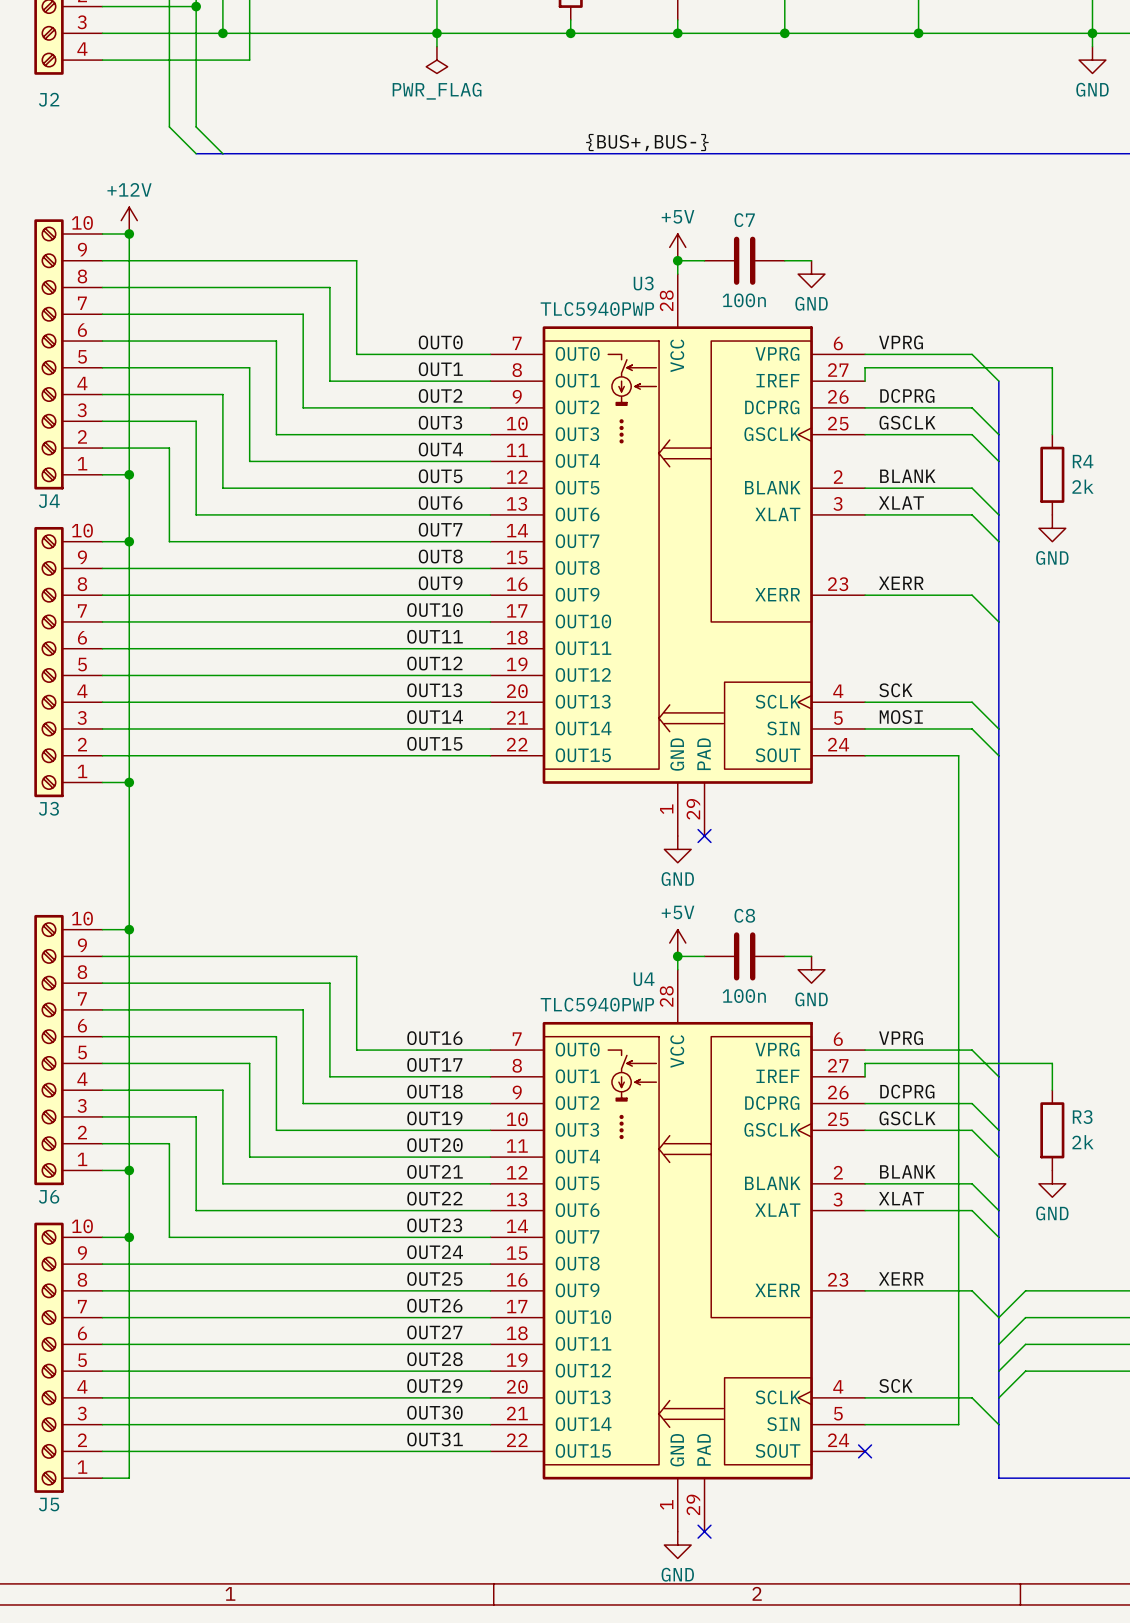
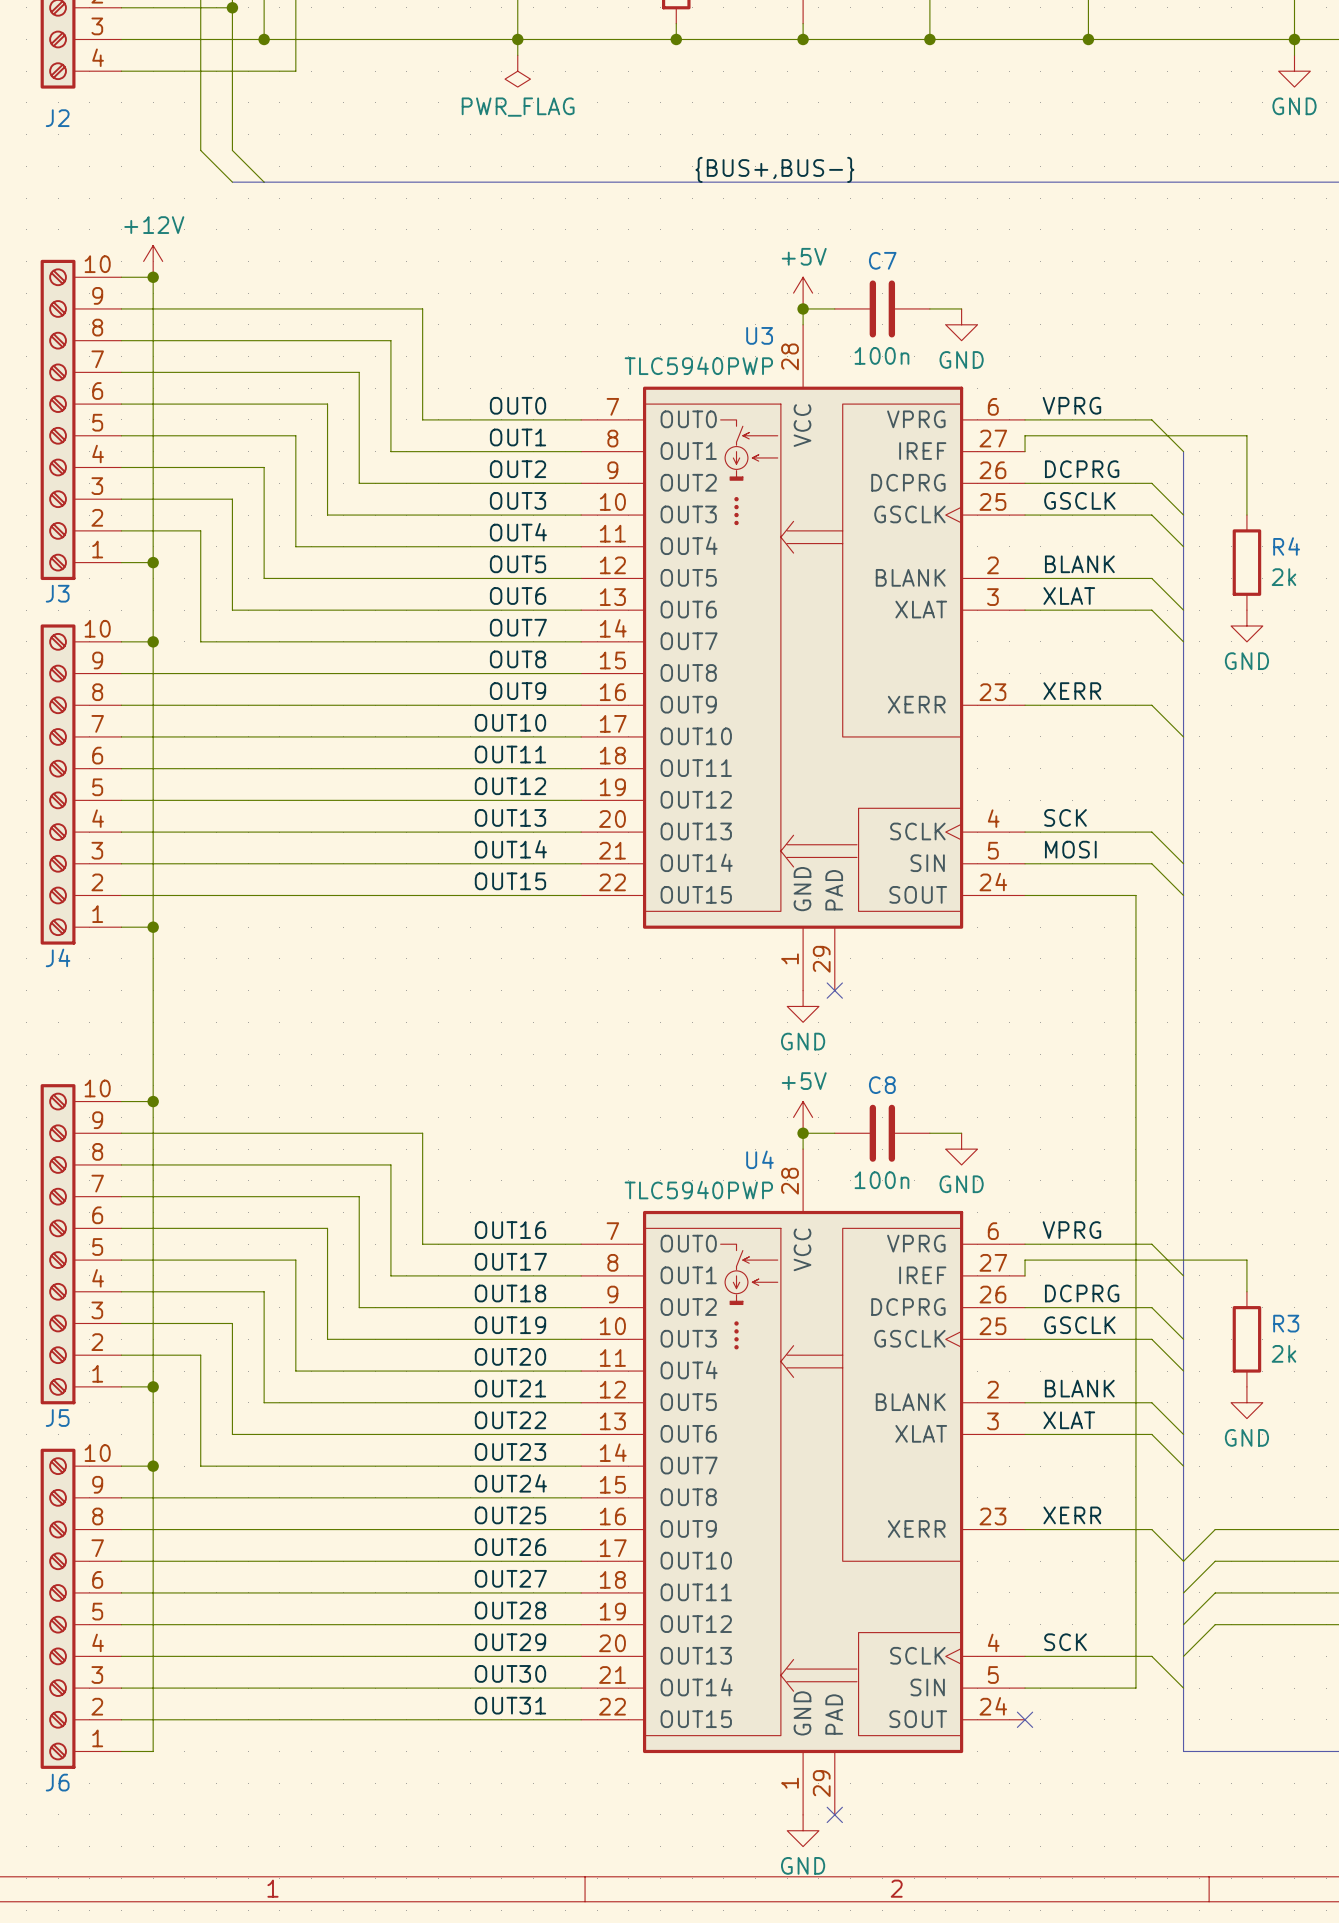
J4 name: J4 (49, 501) -> J3 (57, 593)
J3 name: J3 (48, 808) -> J4 (58, 957)
J6 name: J6 (49, 1196) -> J5 (57, 1418)
J5 name: J5 (49, 1504) -> J6 (57, 1782)

